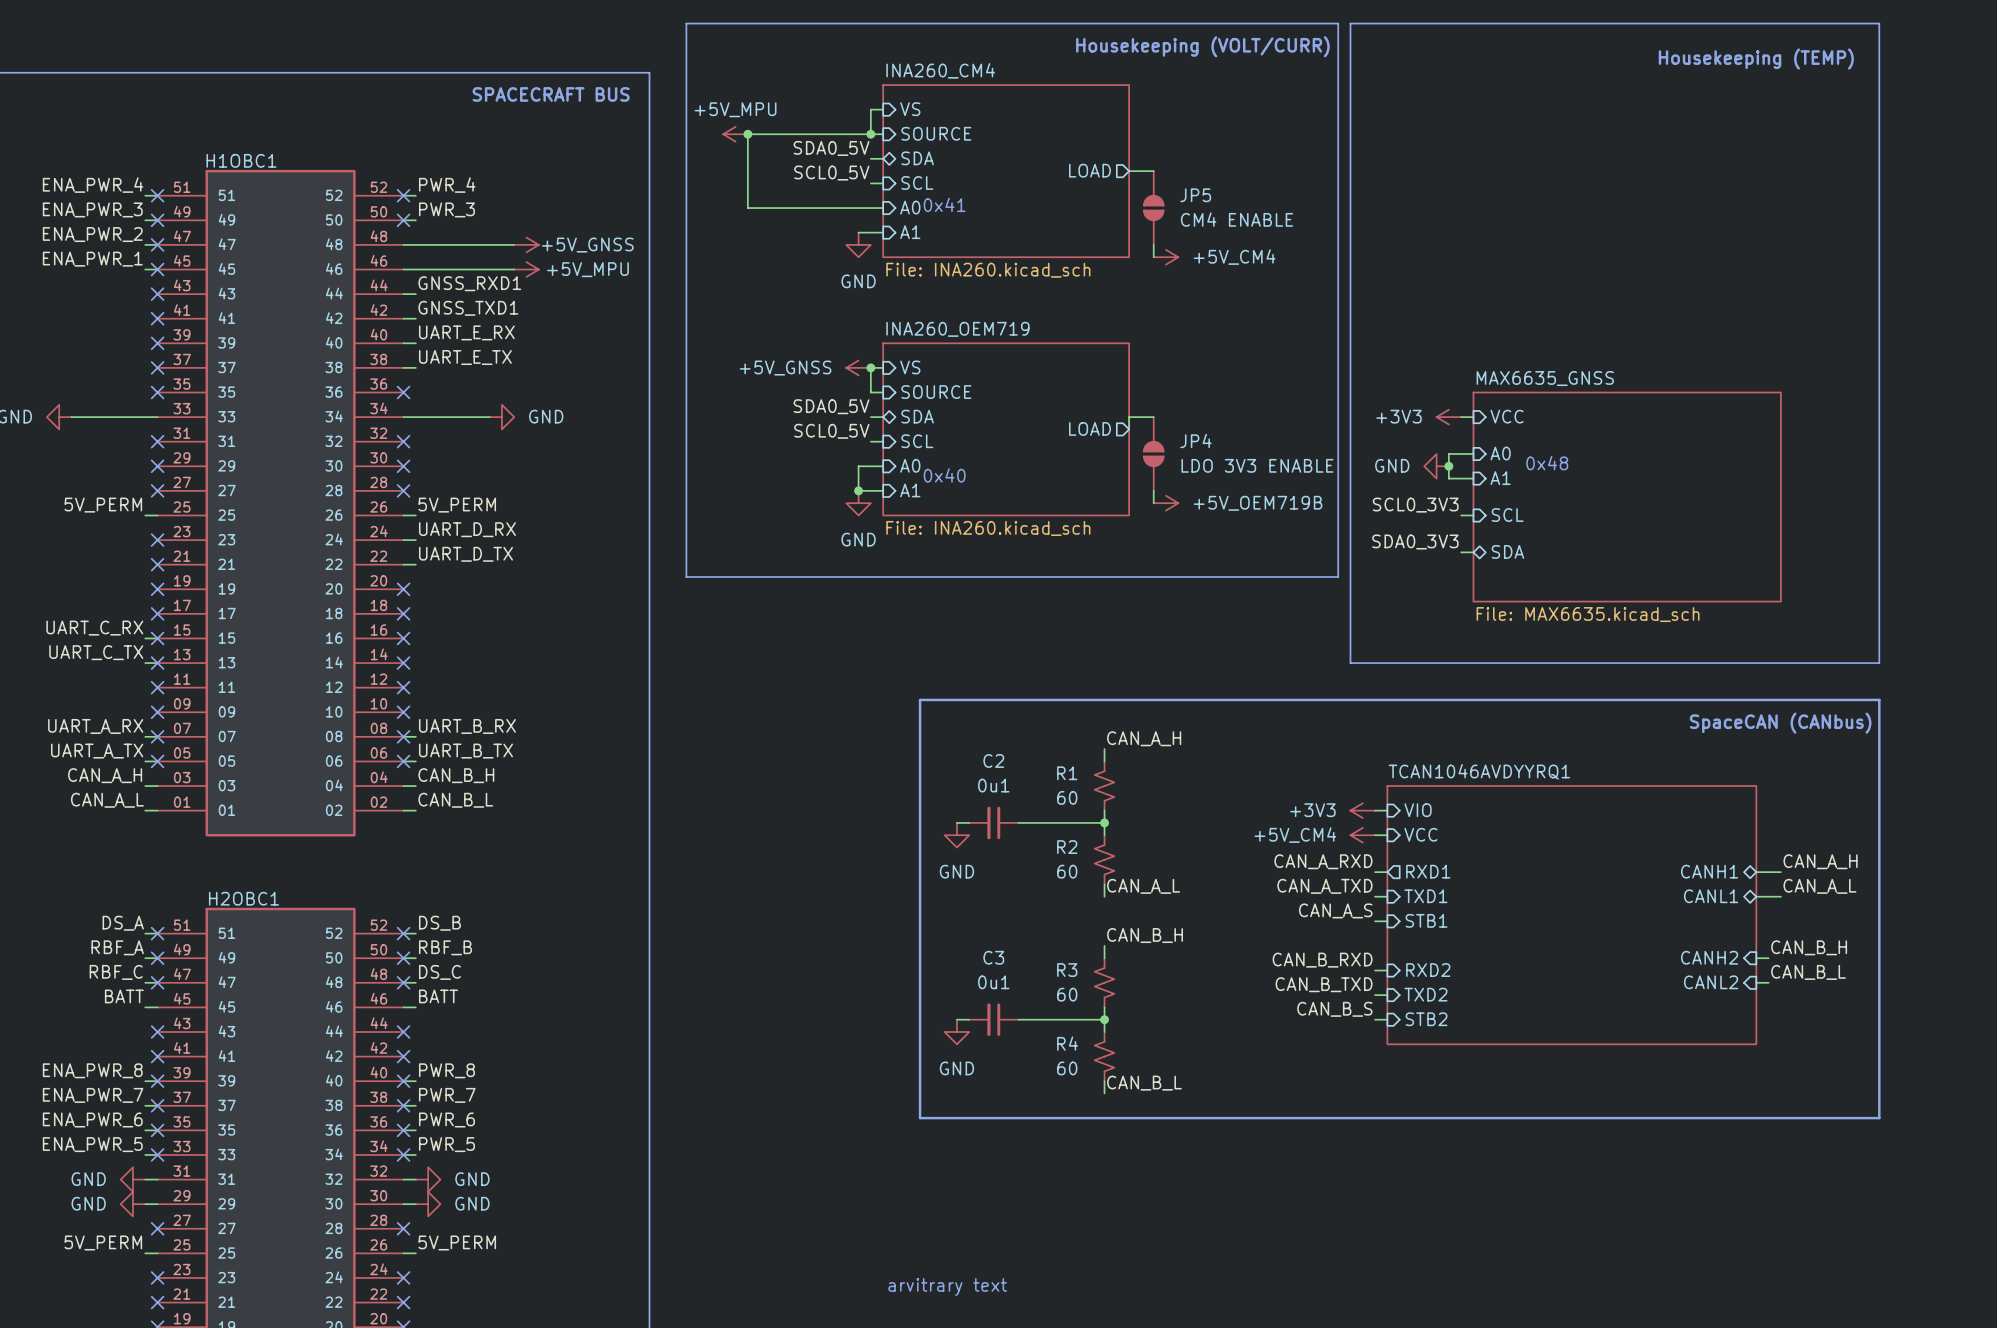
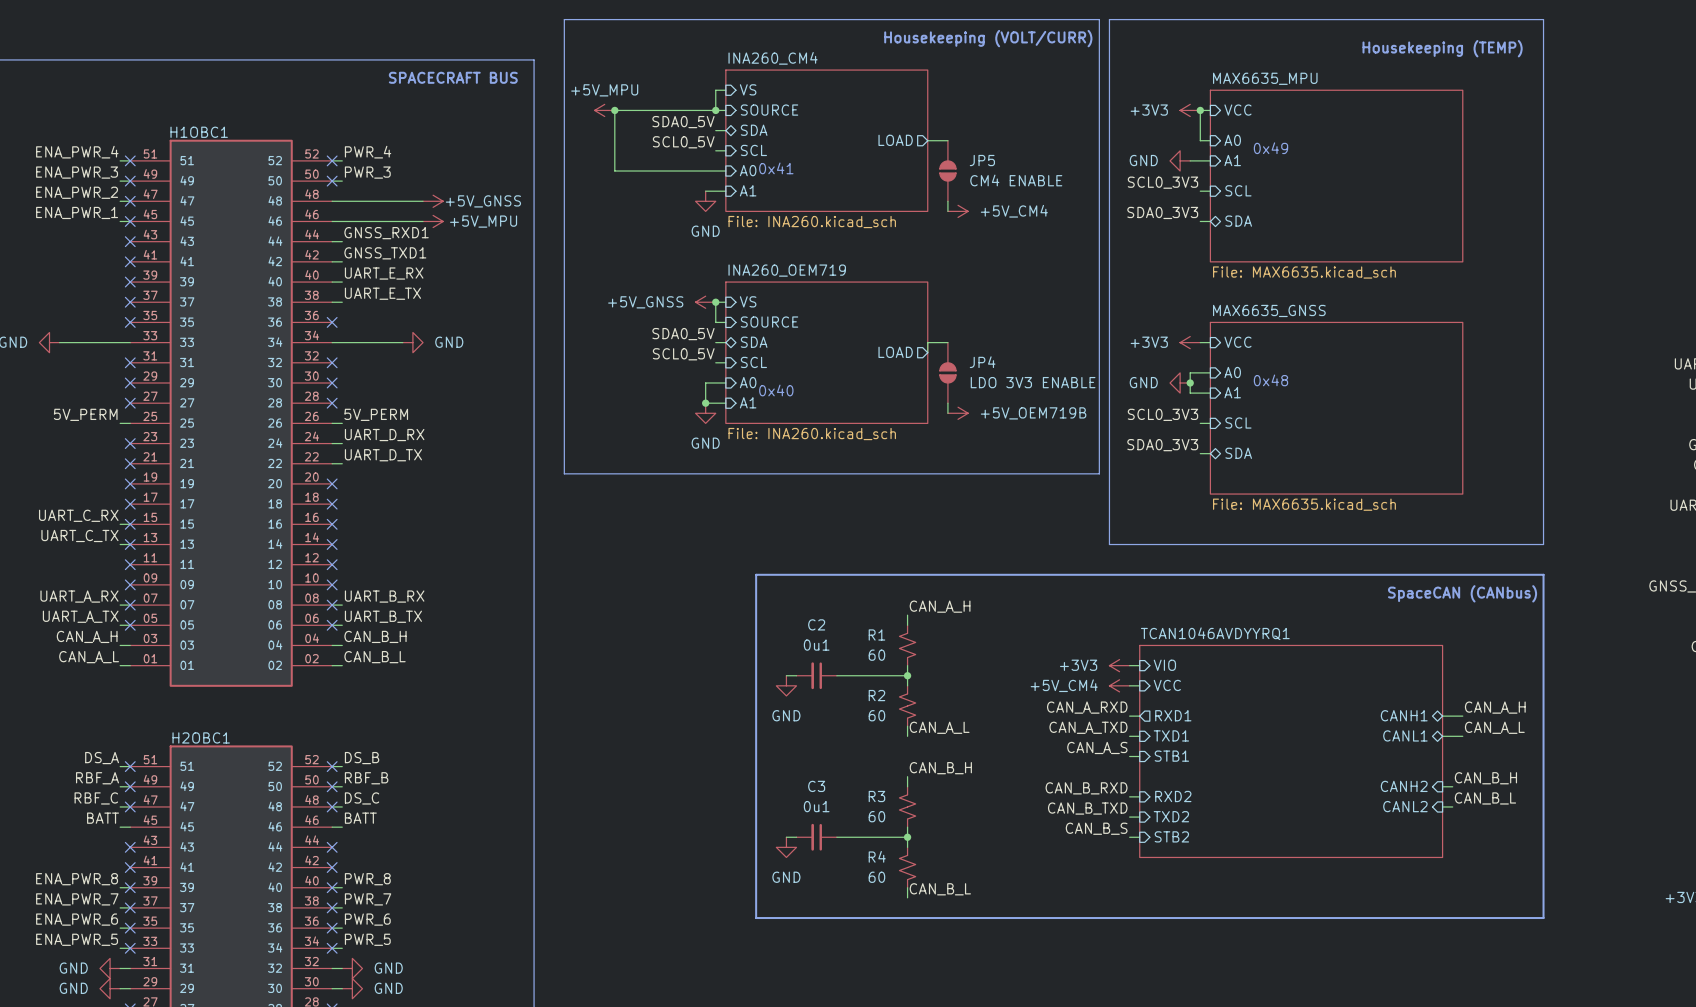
sheet pin: none -> VCC (1237, 110)
power symbol: none -> +3V3 (1190, 110)
junction: none -> (1200, 110)
wire: none -> (1210, 110) (1200, 110) (1200, 140) (1210, 140)
sheet pin: none -> A0 (1232, 140)
text: none -> 0x49 (1270, 148)
power symbol: none -> GND (1180, 160)
wire: none -> (1190, 160) (1210, 160)
sheet pin: none -> A1 (1232, 160)
sheet MAX6635_MPU: none -> File: MAX6635.kicad_sch (1336, 176)
label: none -> SCL0_3V3 (1162, 182)
wire: none -> (1200, 191) (1210, 191)
sheet pin: none -> SCL (1238, 190)
label: none -> SDA0_3V3 (1162, 212)
wire: none -> (1200, 221) (1210, 221)
sheet pin: none -> SDA (1238, 221)

